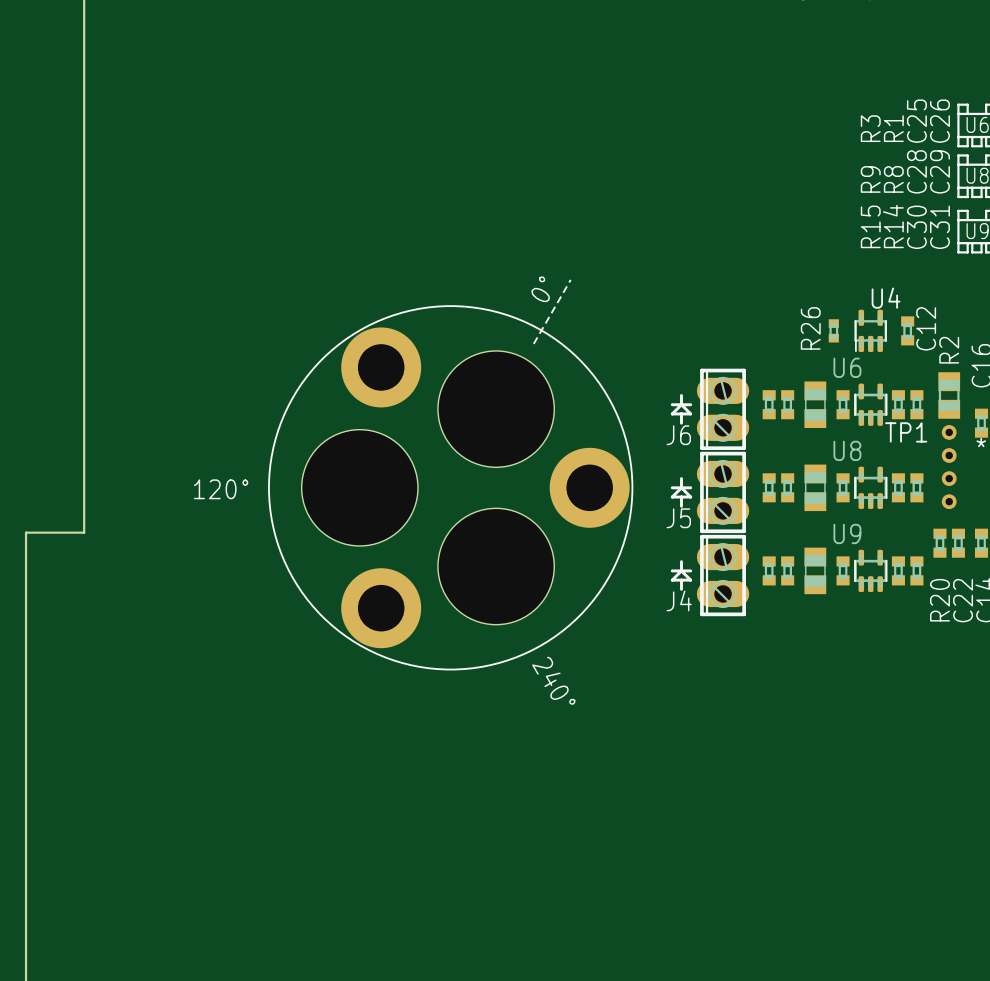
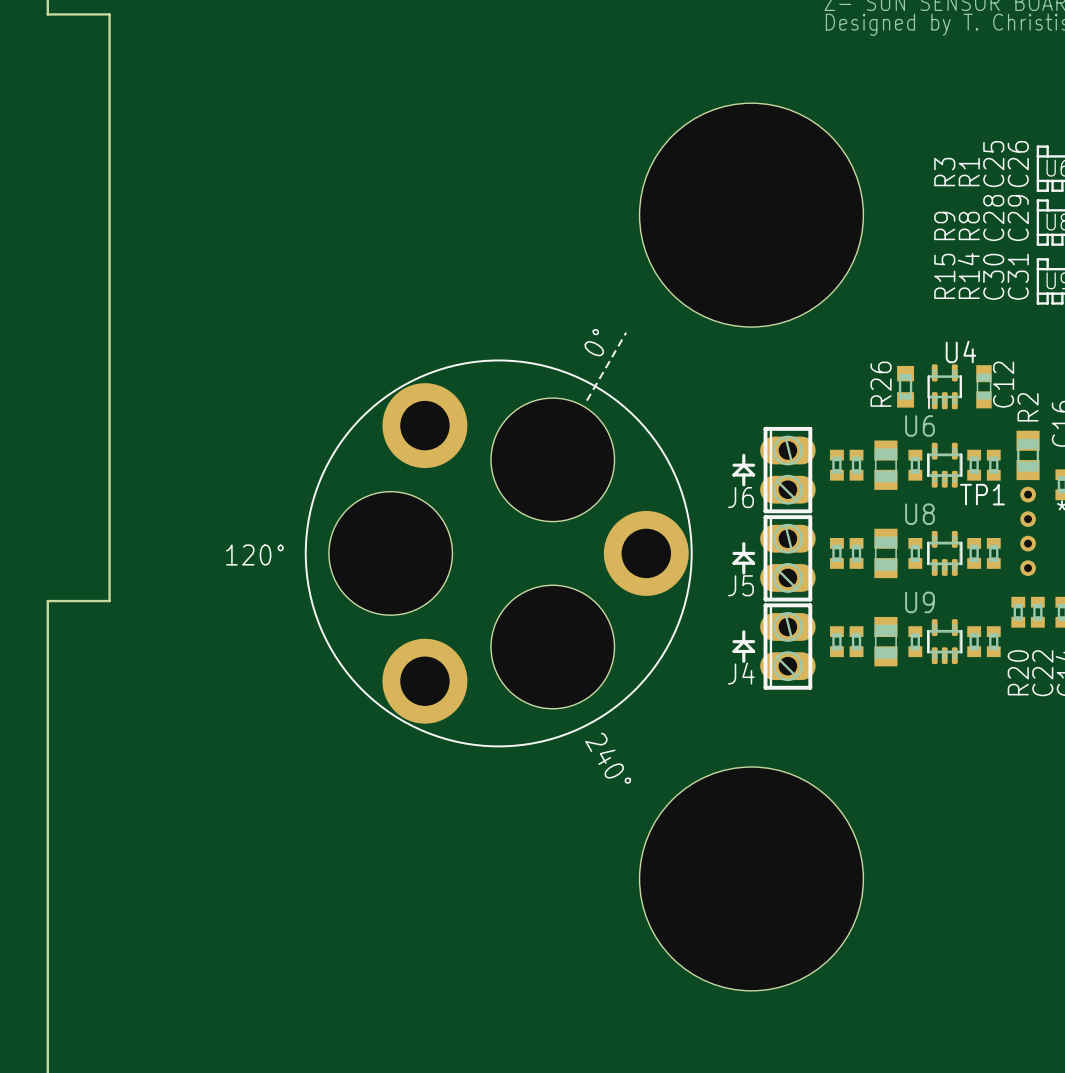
hole: none -> (751, 215)
part footprint: [268, 279, 634, 671] -> [304, 331, 693, 748]
C12 footprint: [901, 316, 915, 346] -> [976, 365, 992, 409]
R26 footprint: [828, 319, 839, 343] -> [897, 365, 915, 408]
hole: none -> (751, 878)

